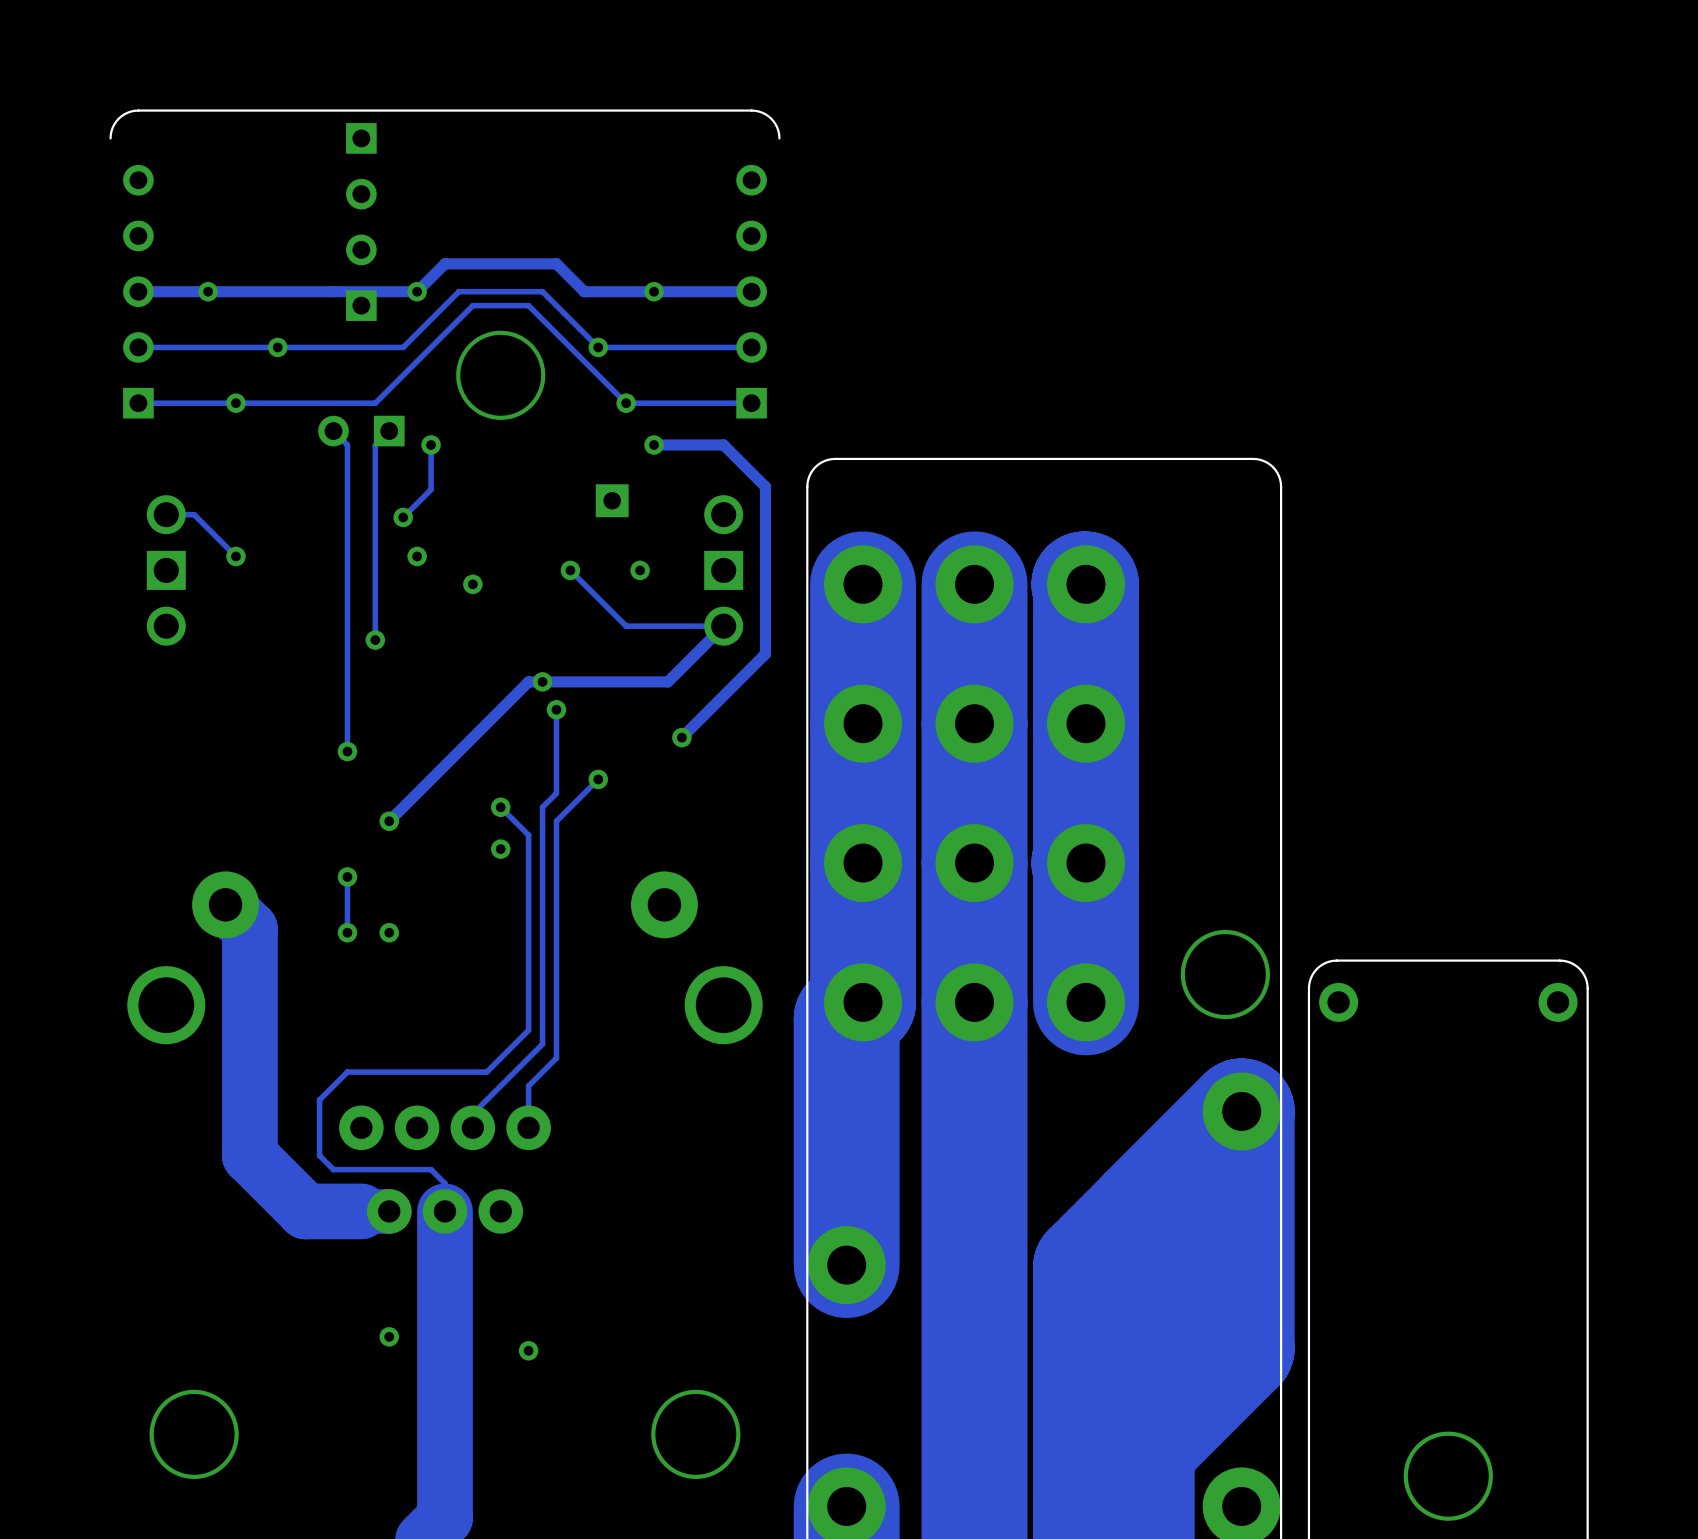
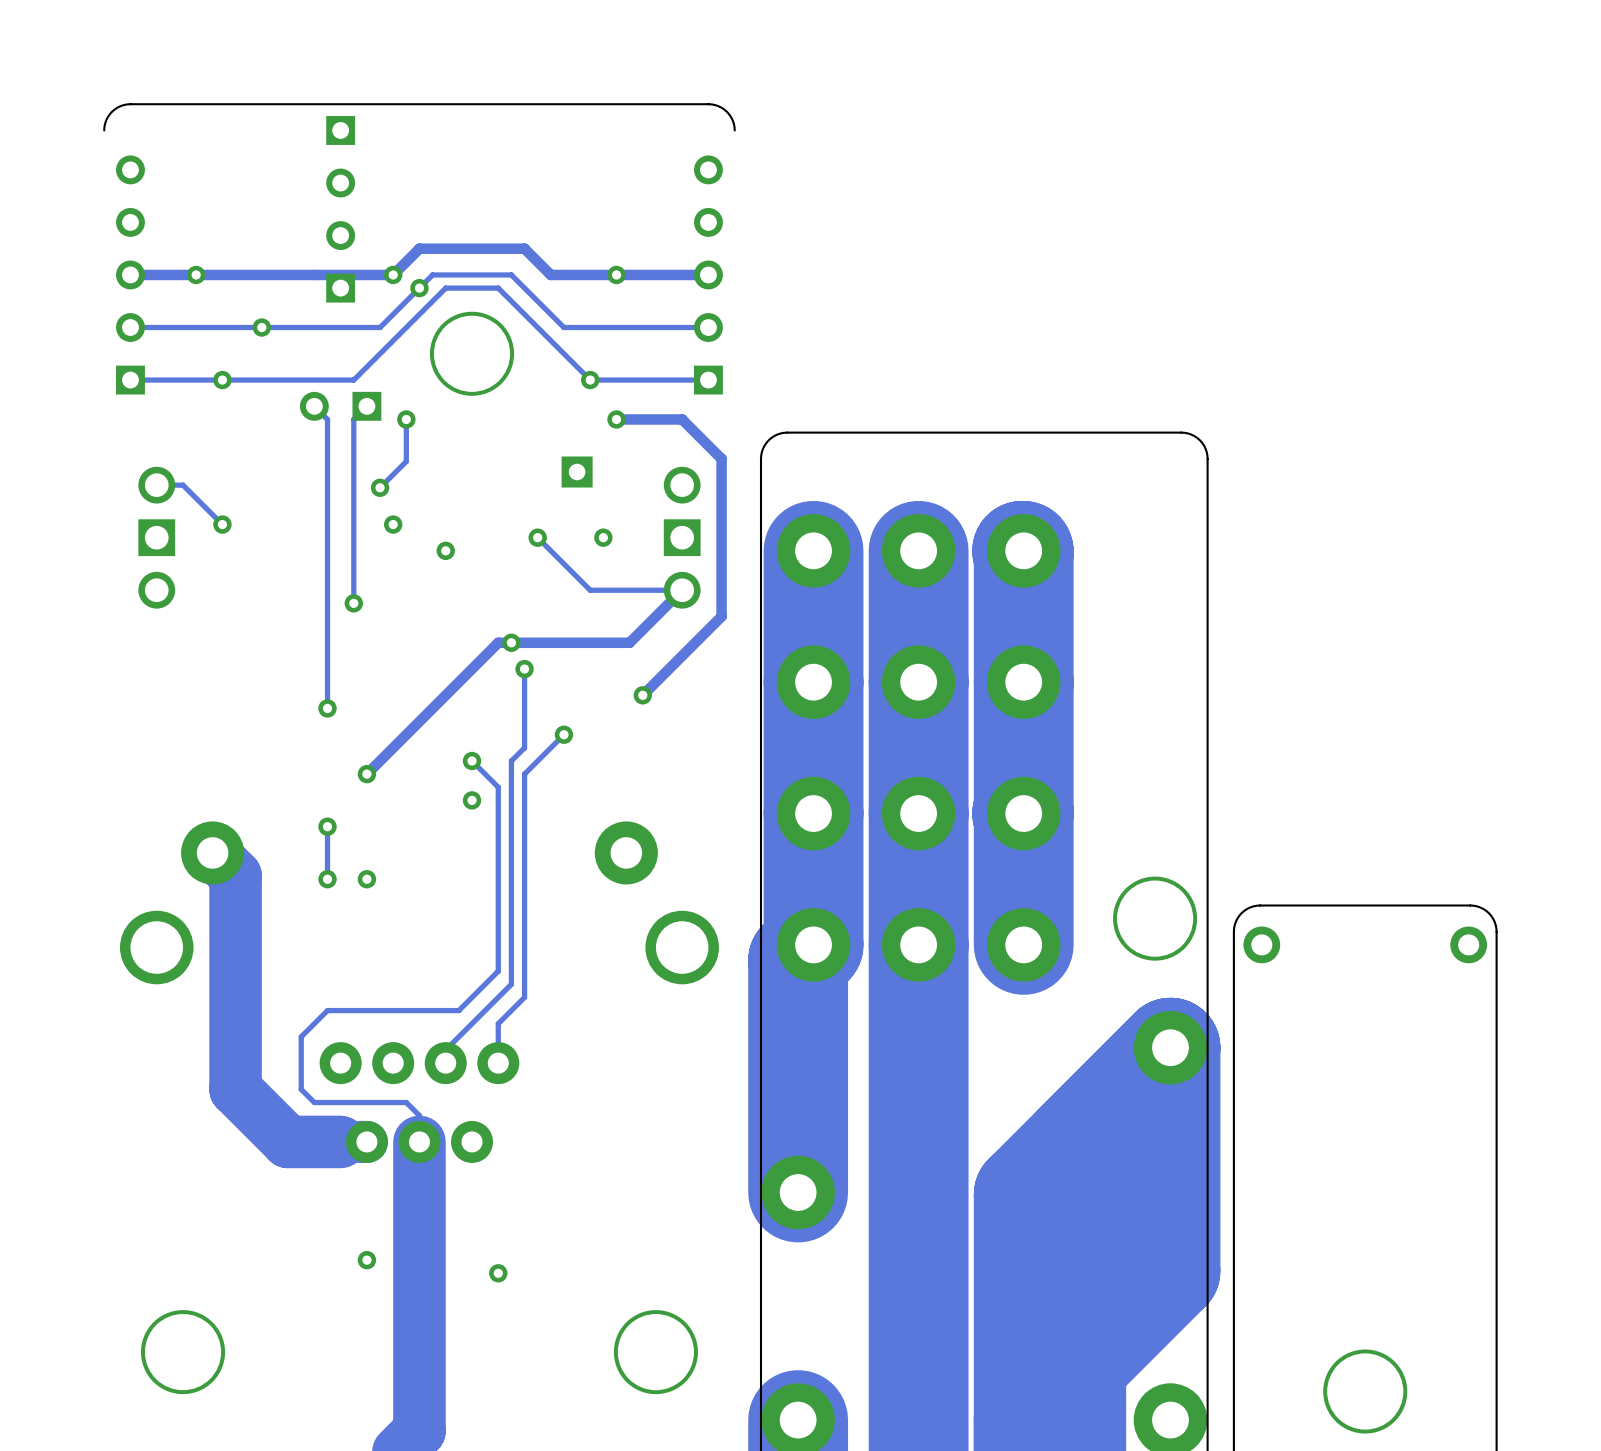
via: none -> (419, 288)
via: (598, 347) -> none

